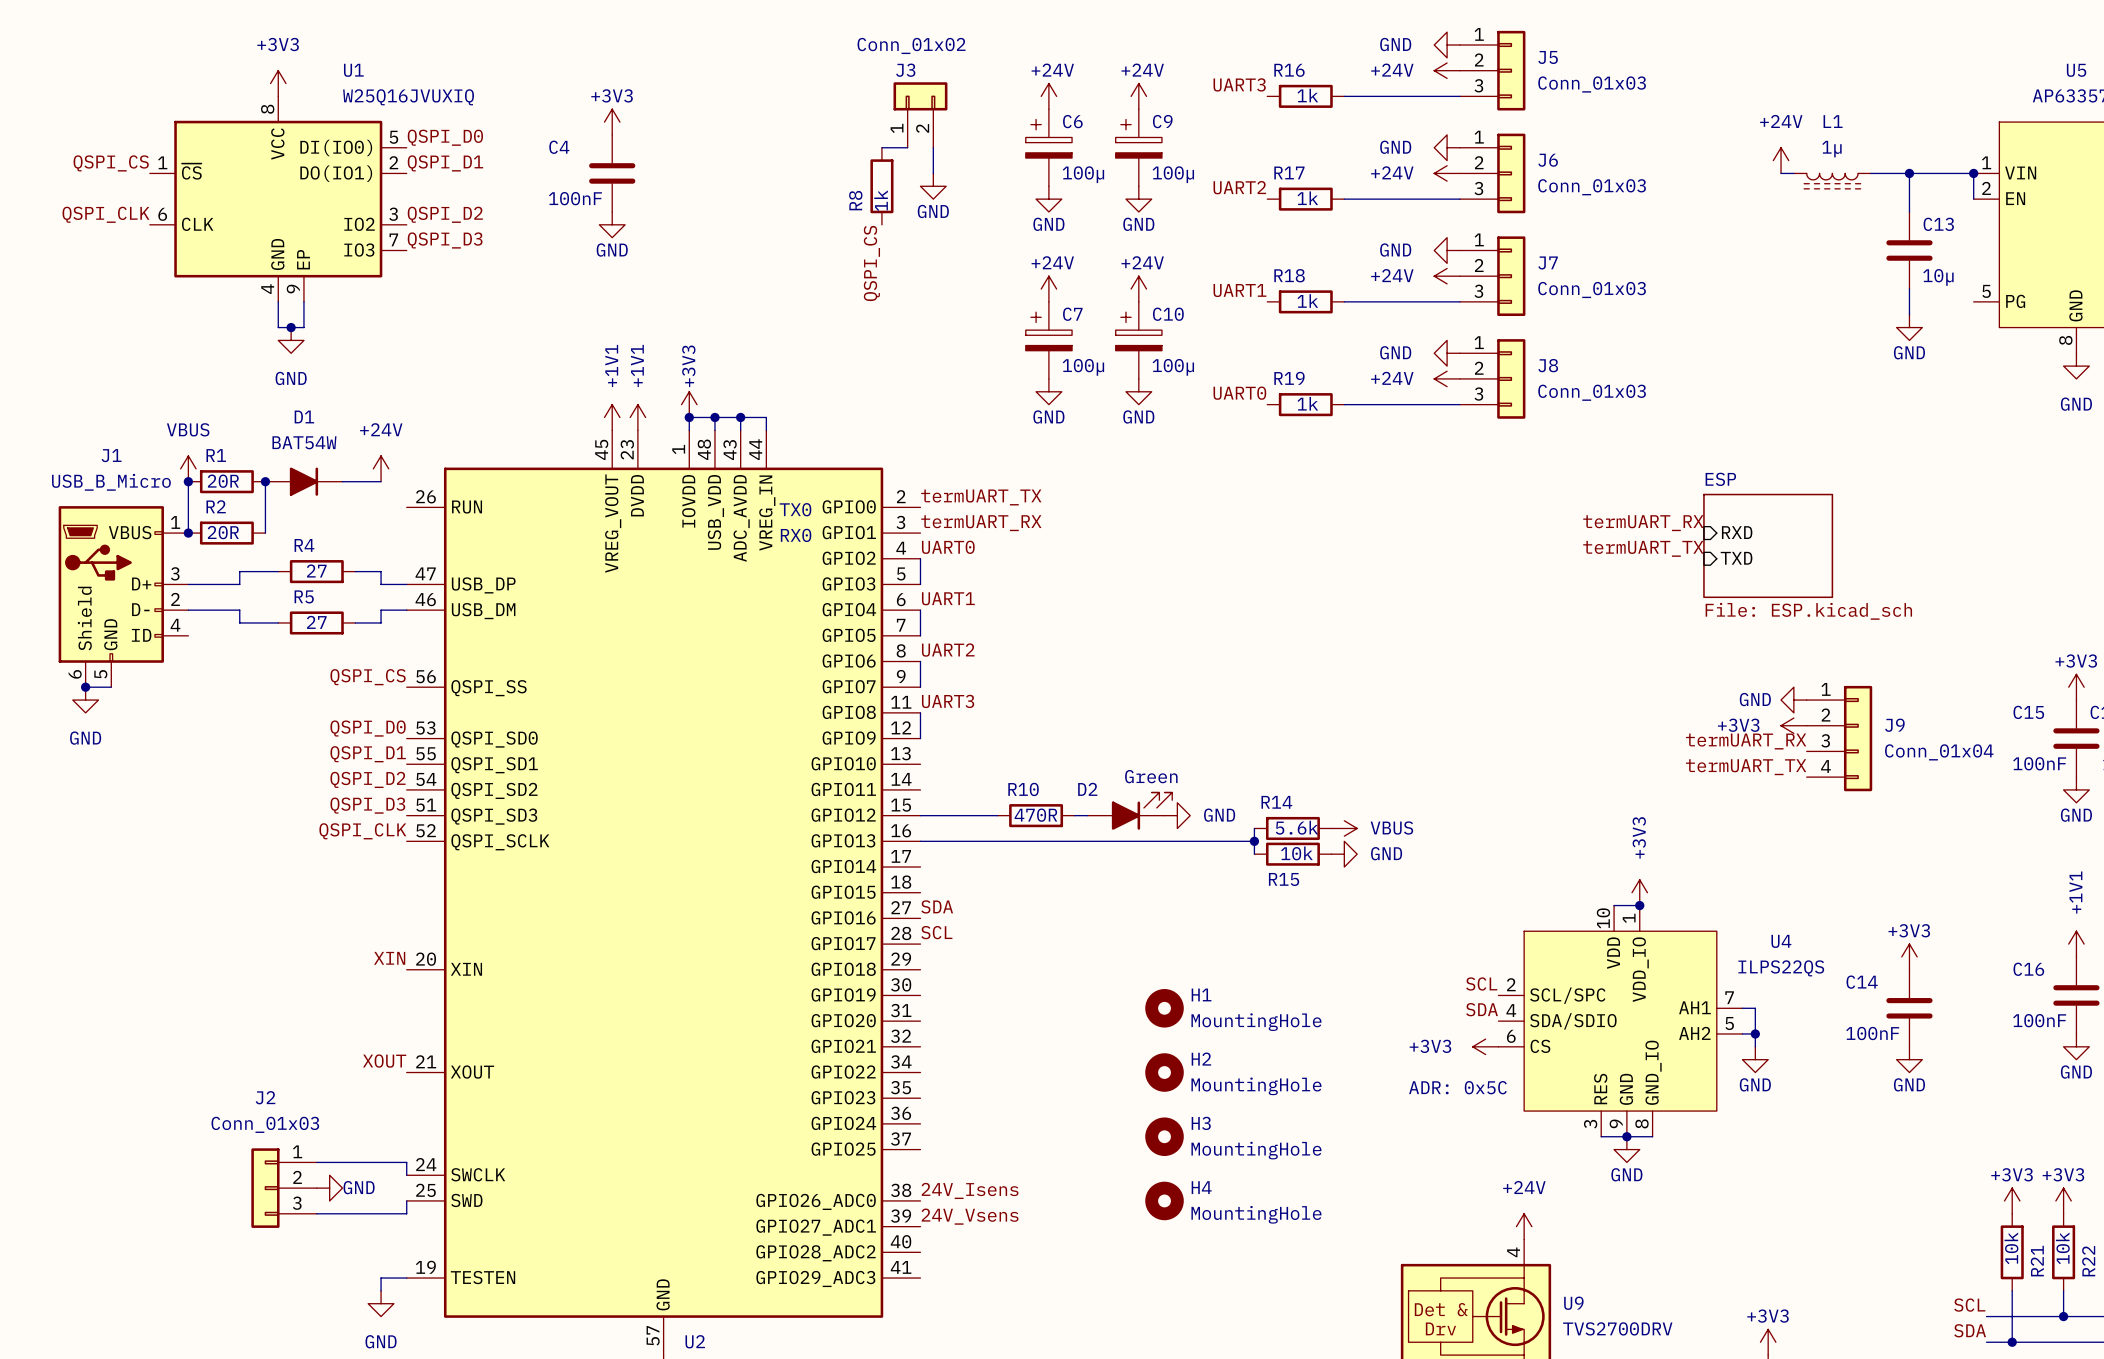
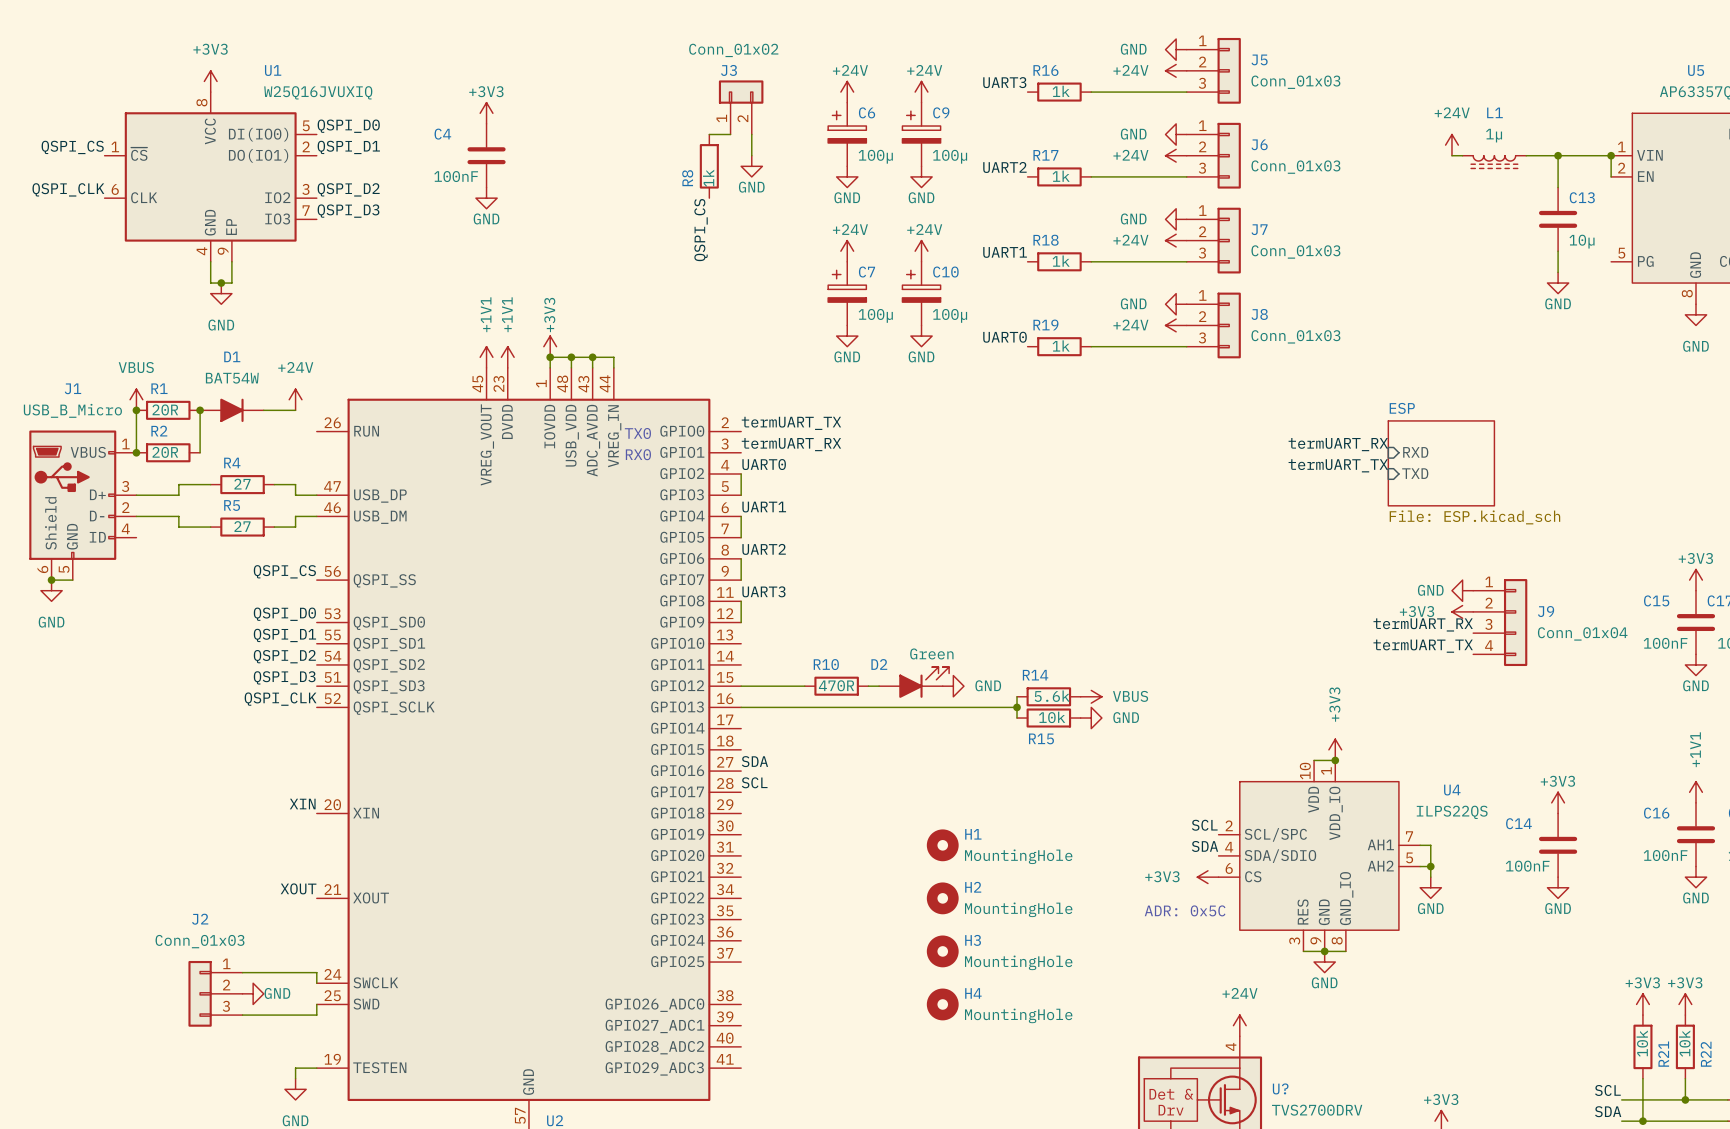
label: 24V_Isens (970, 1190) -> none
label: 24V_Vsens (970, 1216) -> none
U9 name: U9 (1573, 1303) -> U? (1280, 1088)

